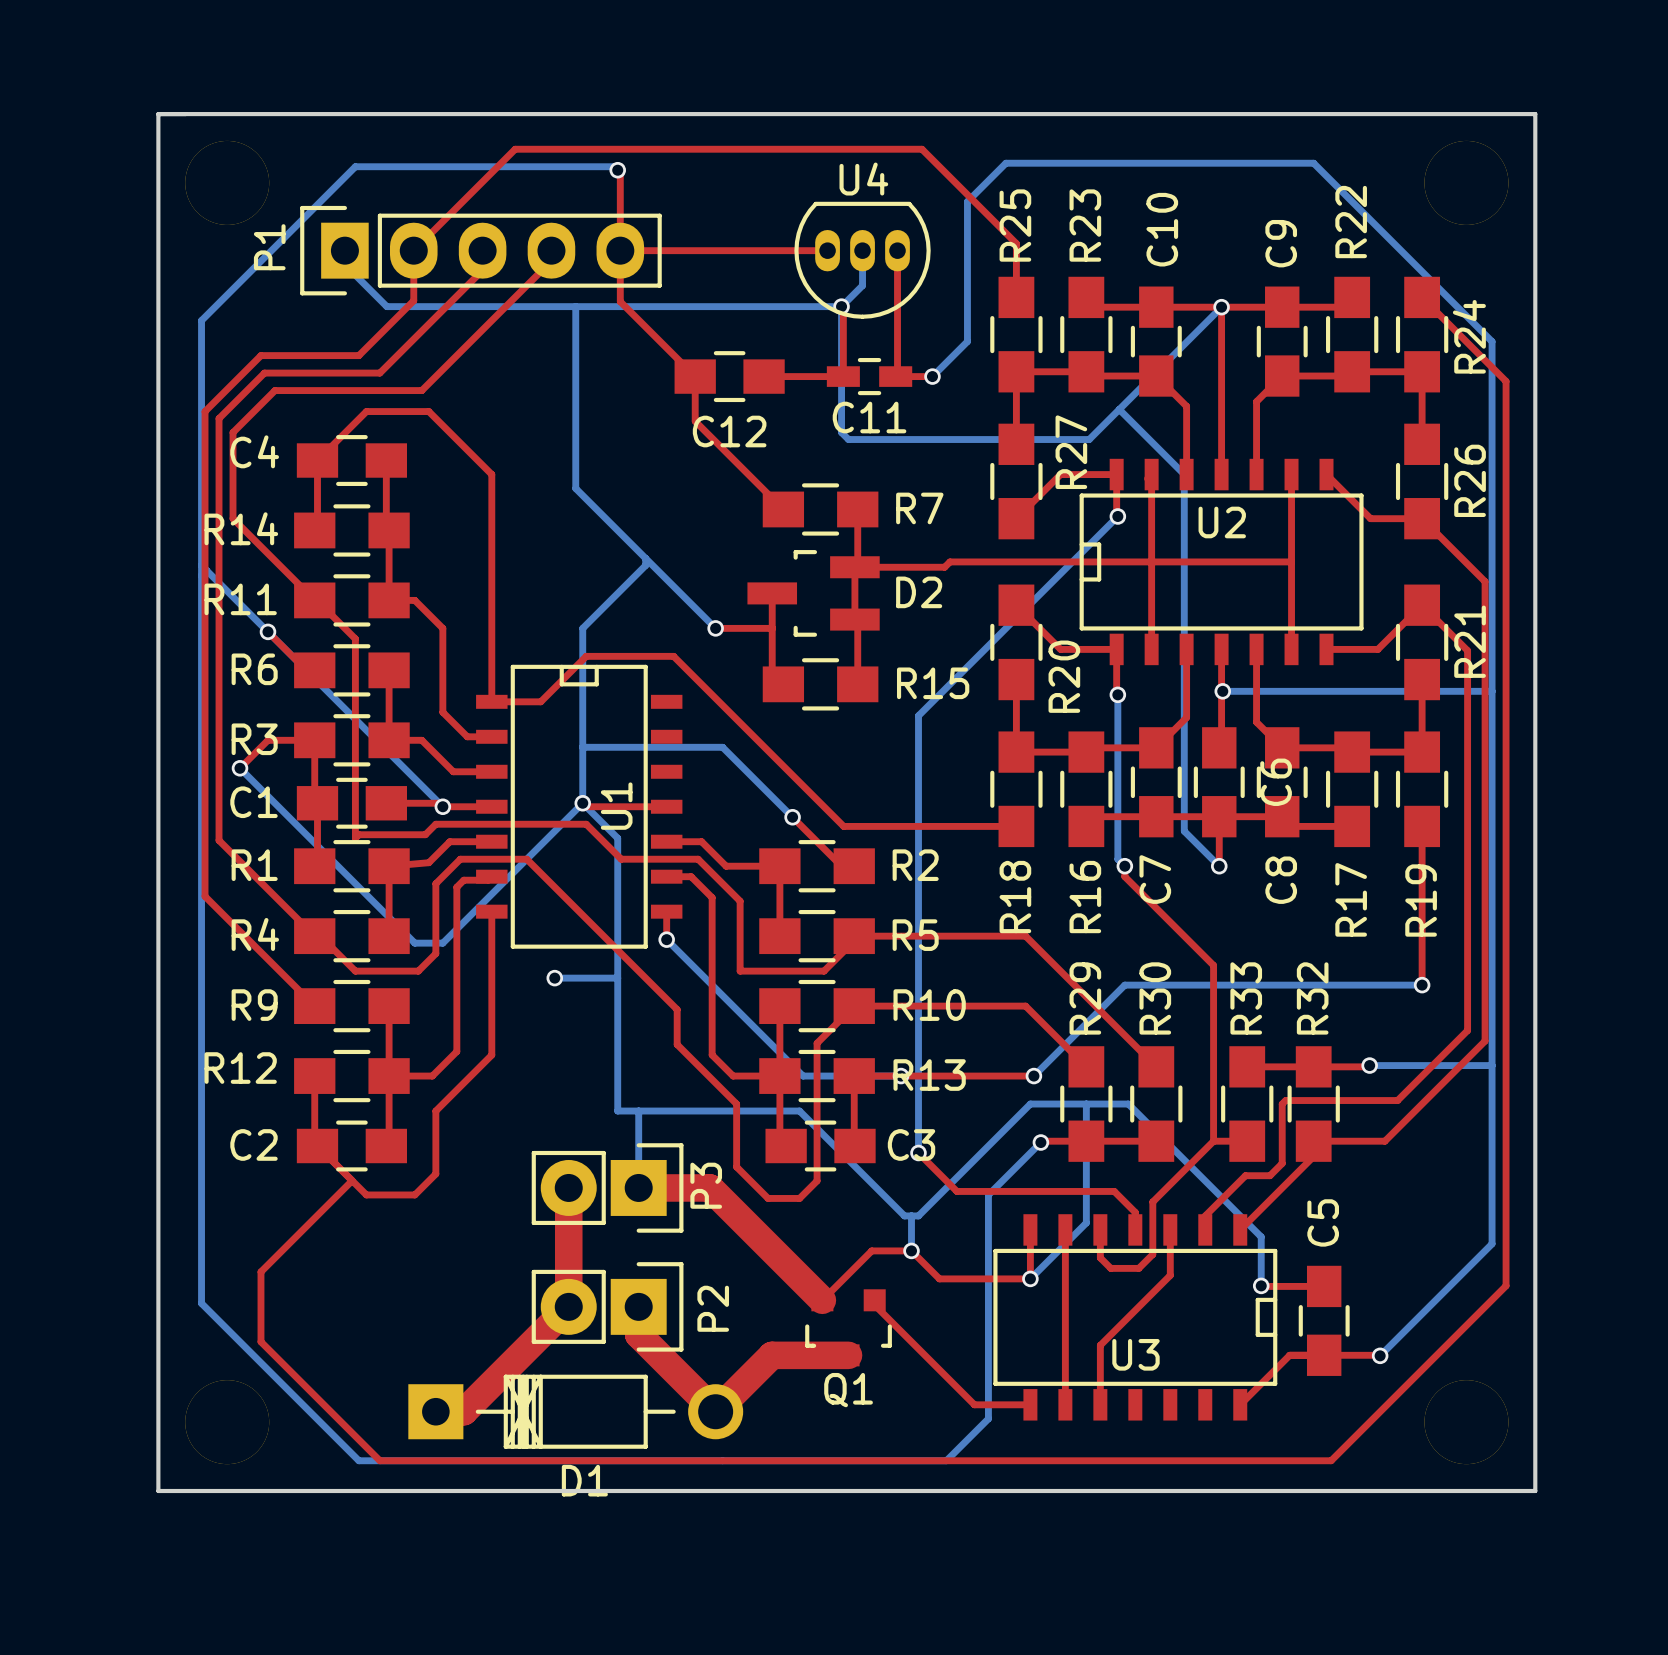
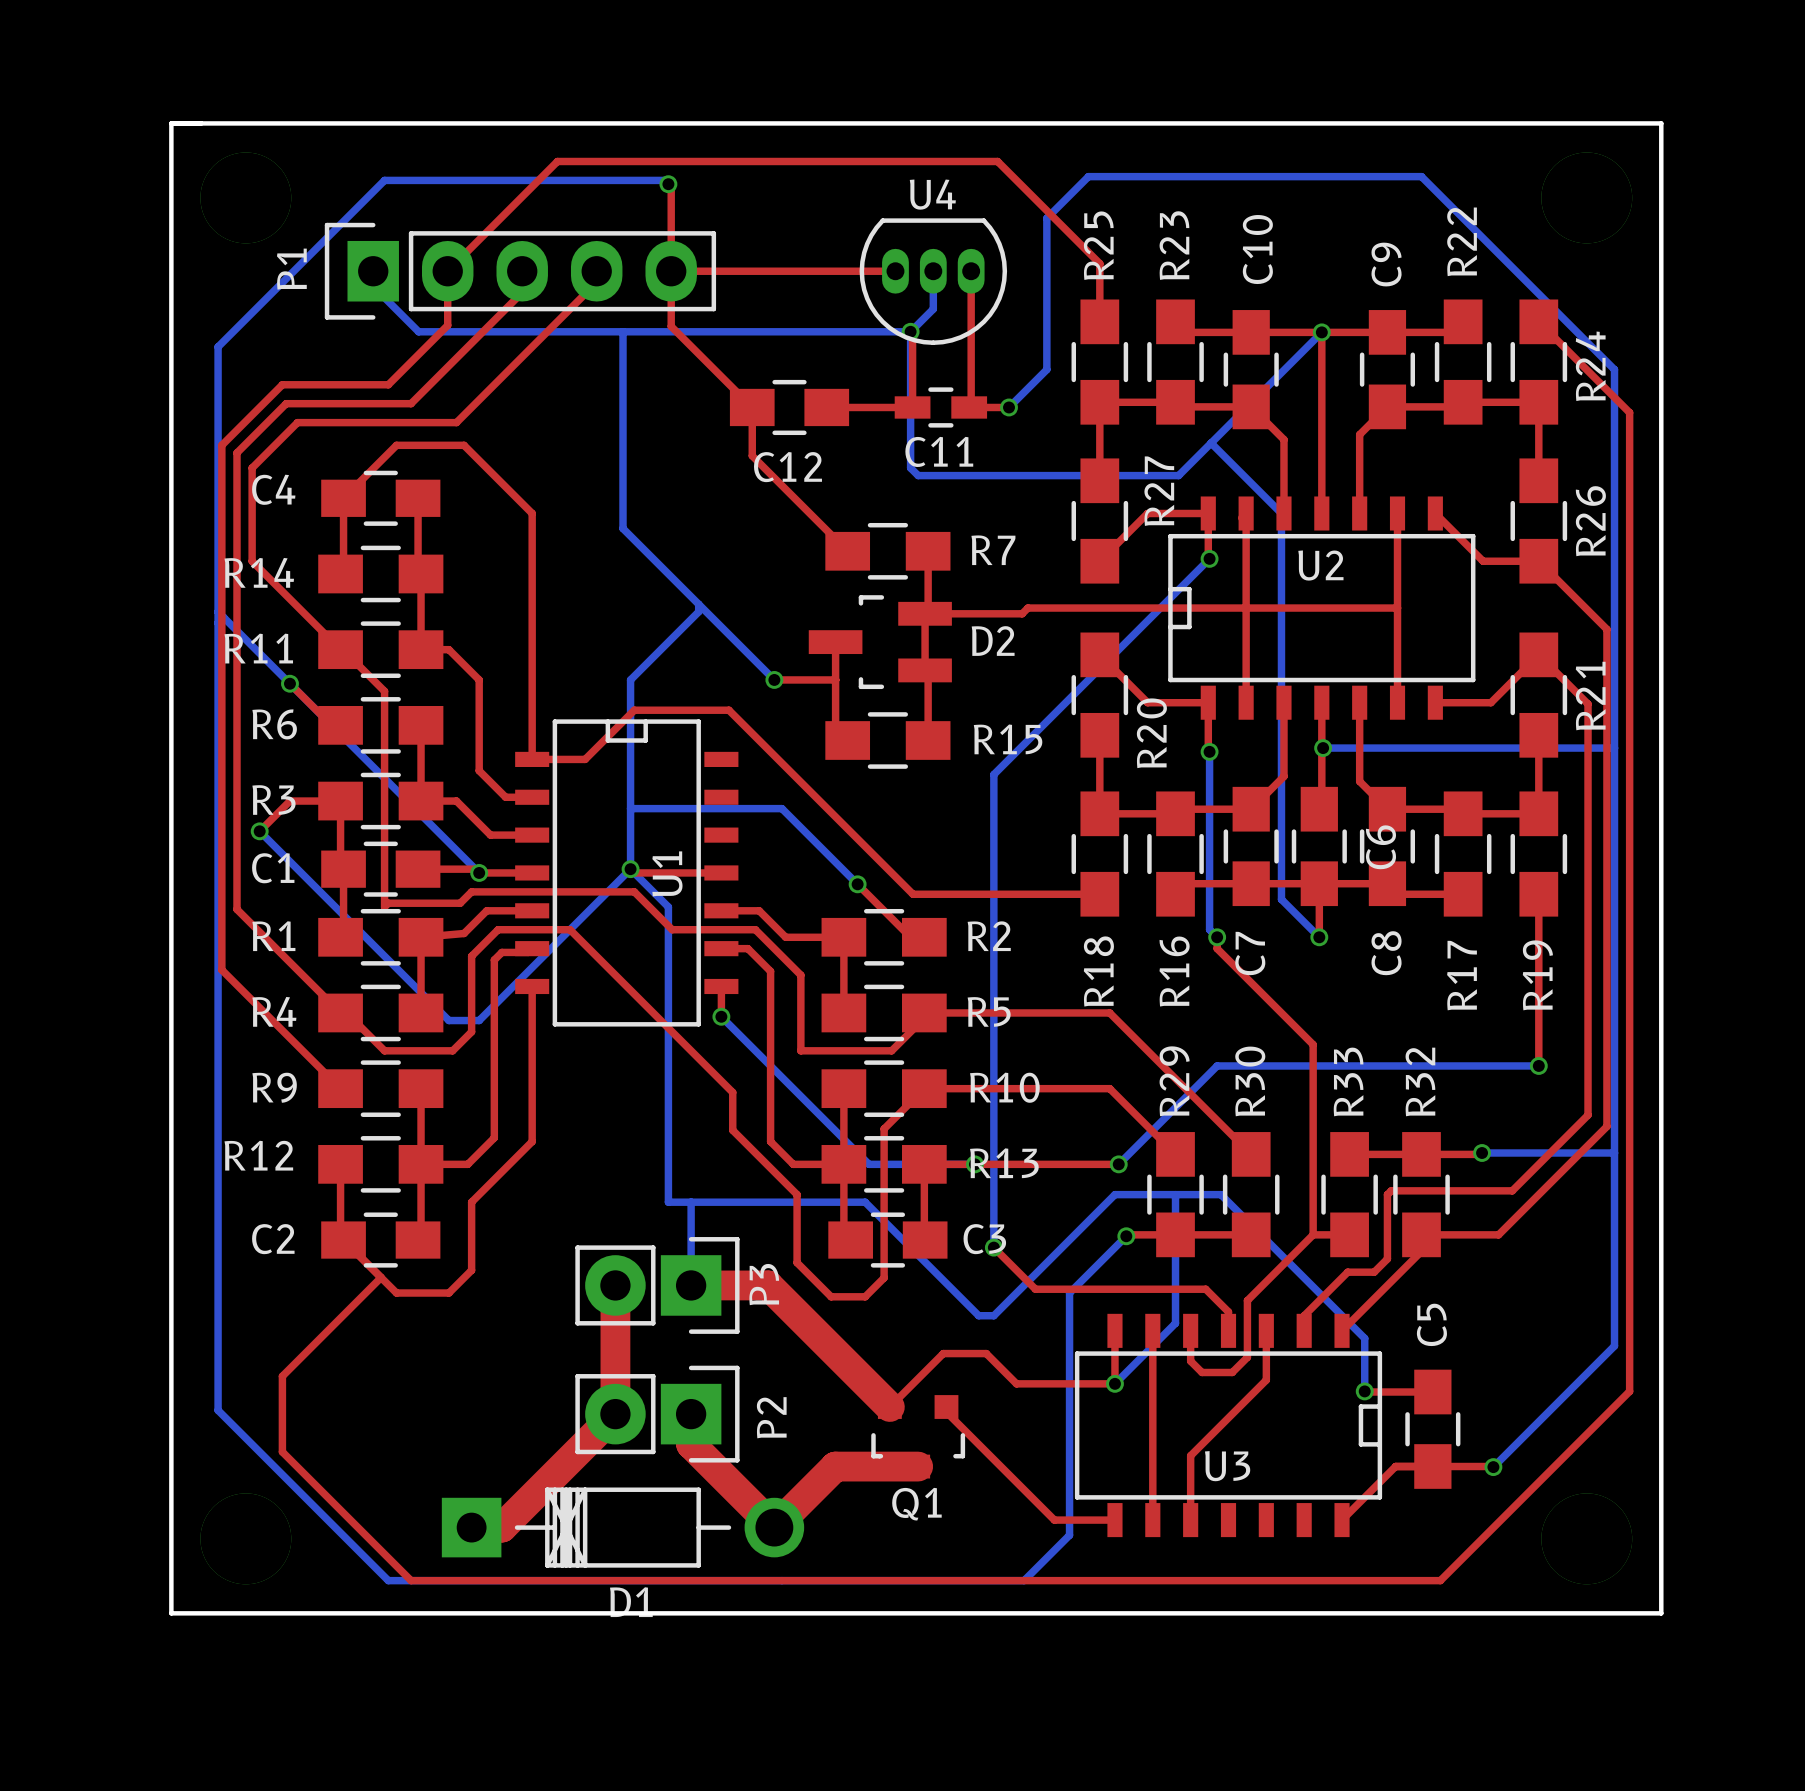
bottom track: (554, 978) (617, 978) -> none
via: (554, 978) -> none
bottom track: (911, 1215) (911, 1250) -> none
via: (911, 1250) -> none

